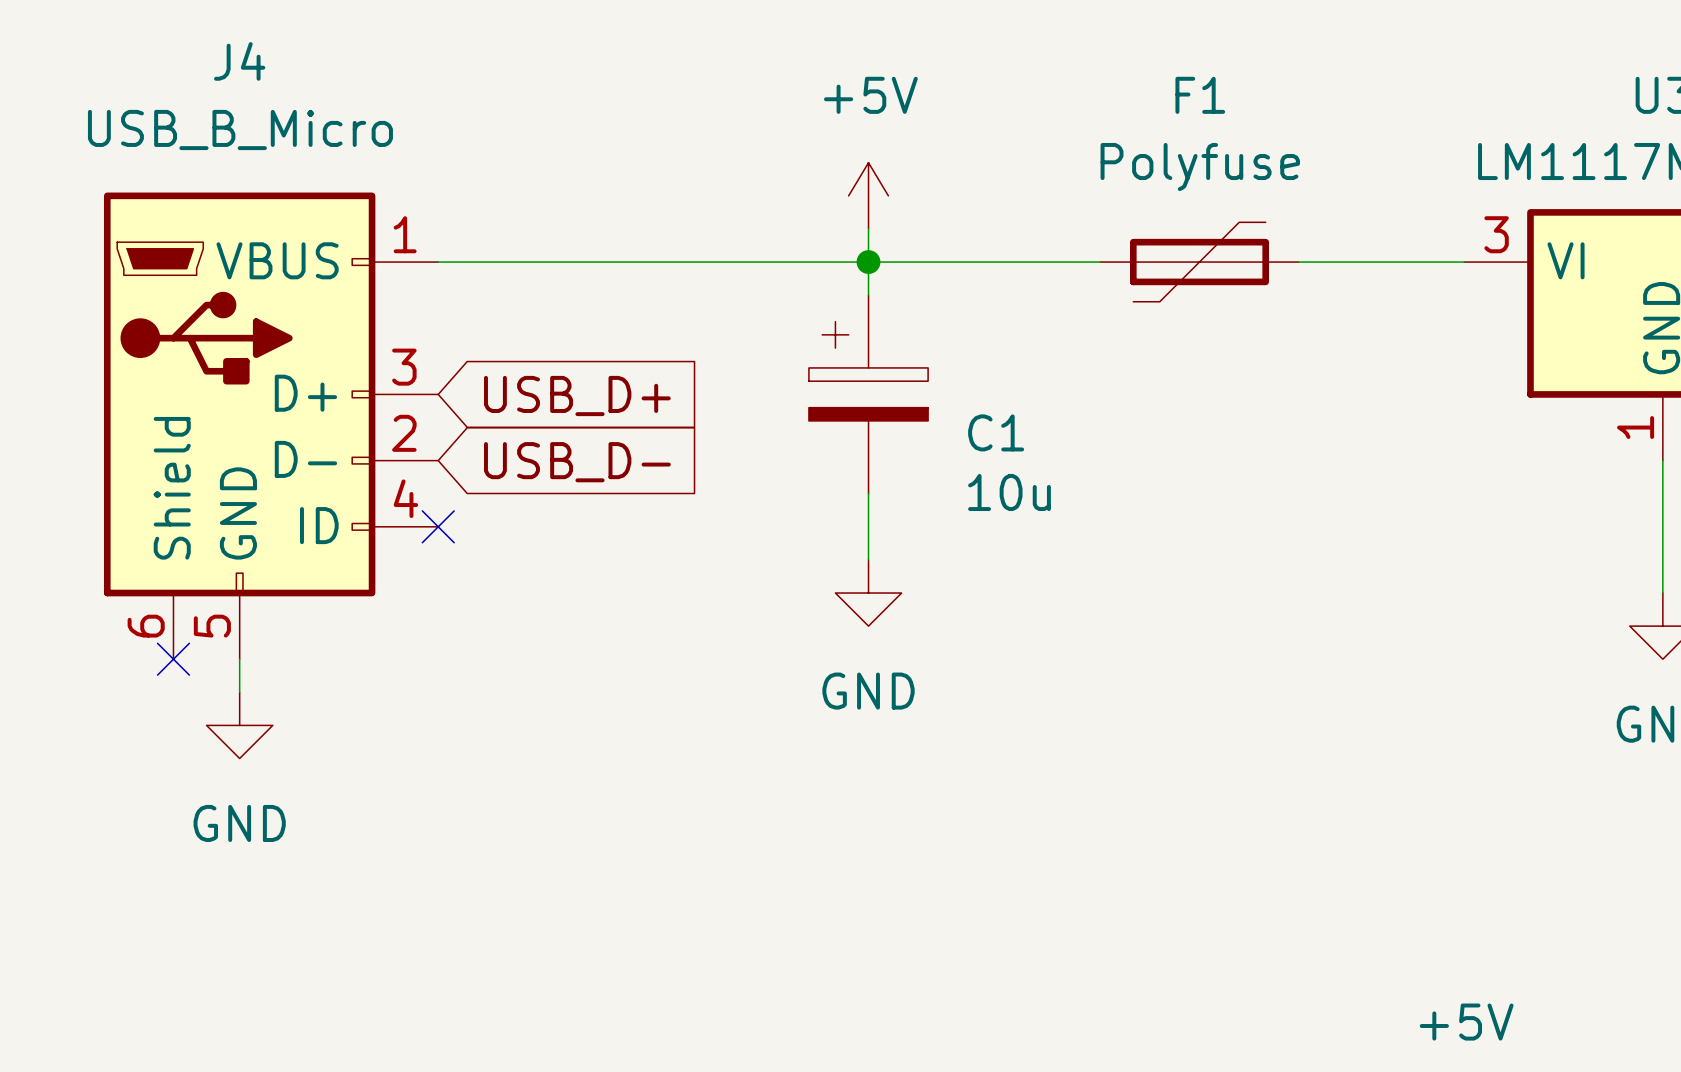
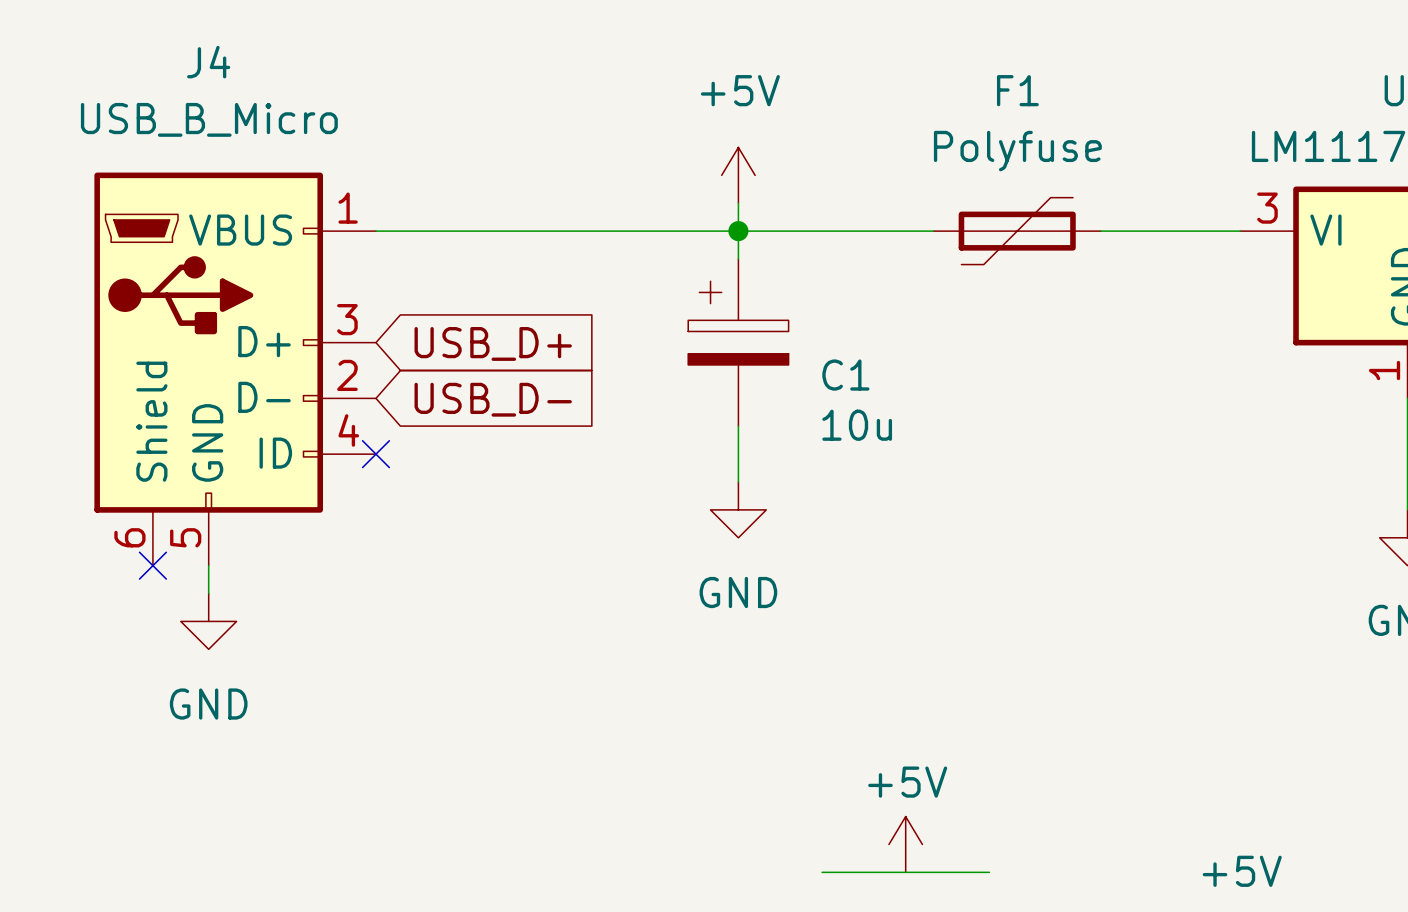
power symbol: none -> +5V (905, 844)
wire: none -> (822, 872) (989, 872)

